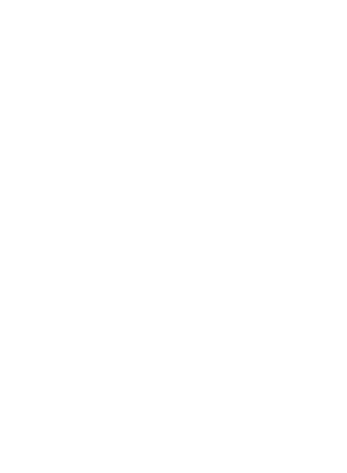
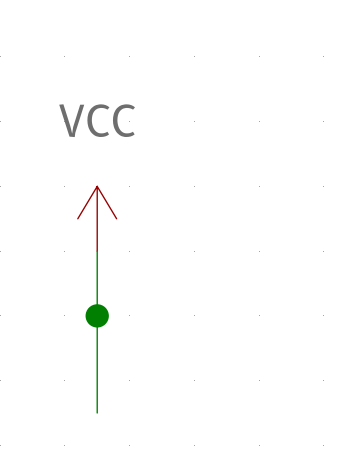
power symbol: none -> VCC (97, 218)
wire: none -> (97, 251) (97, 412)
junction: none -> (97, 315)

